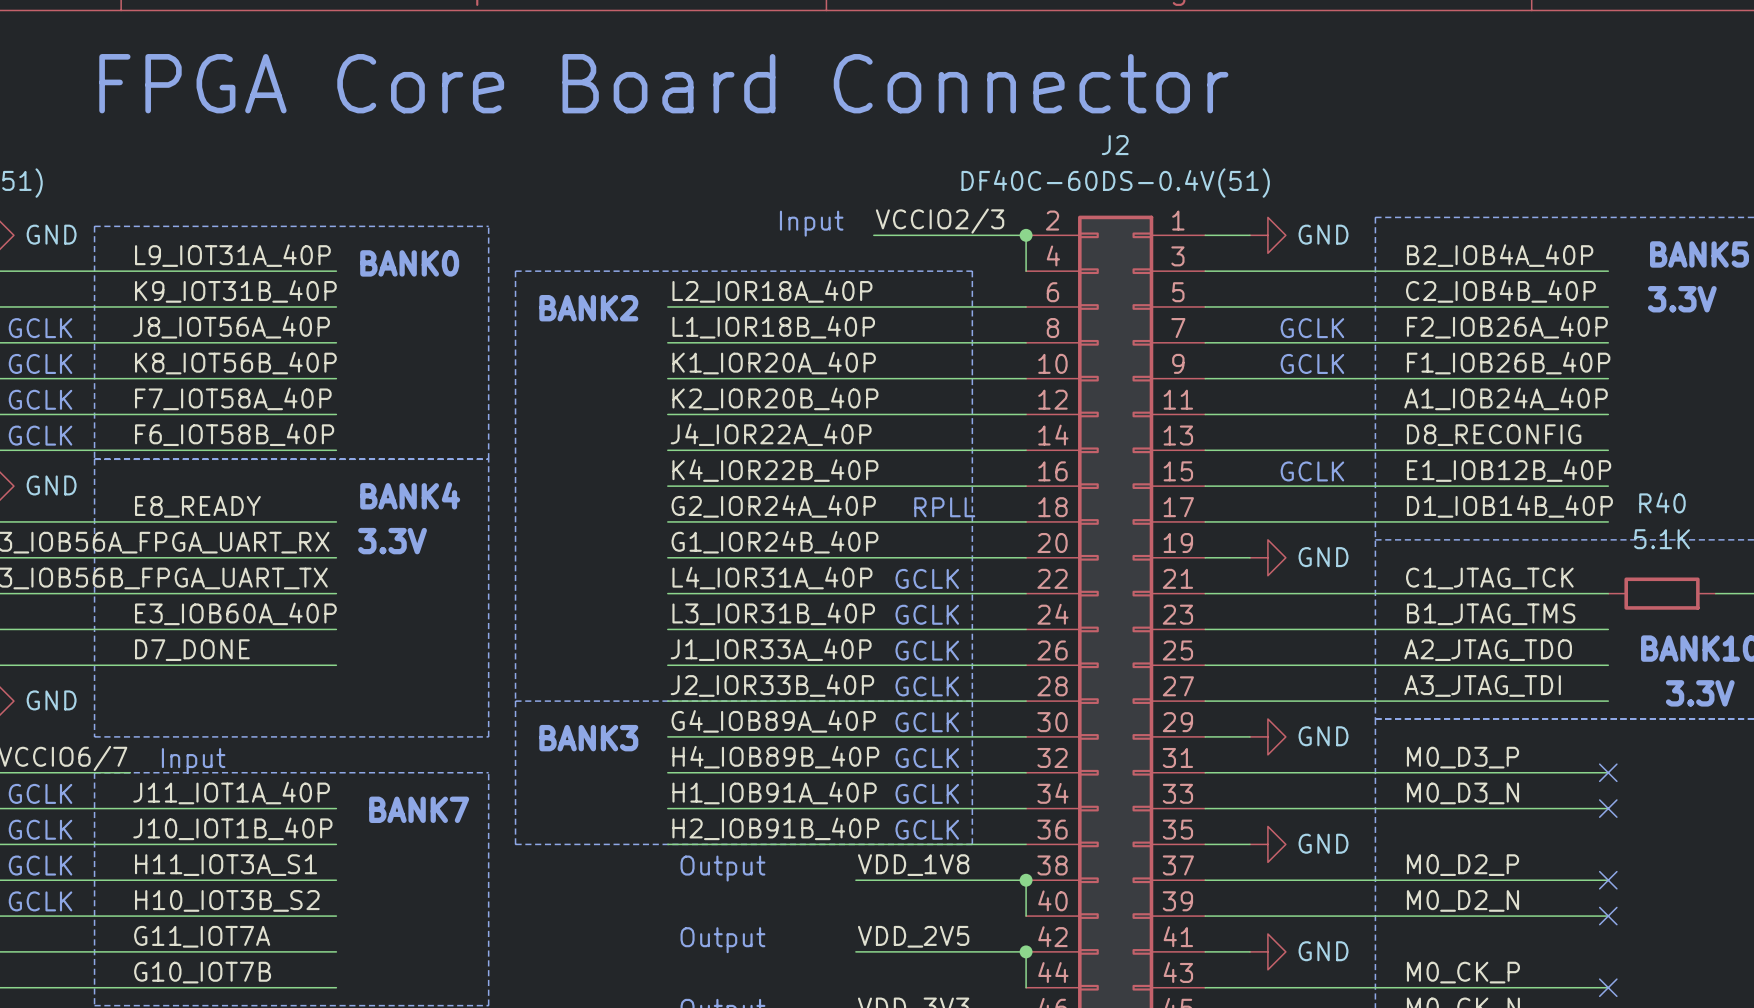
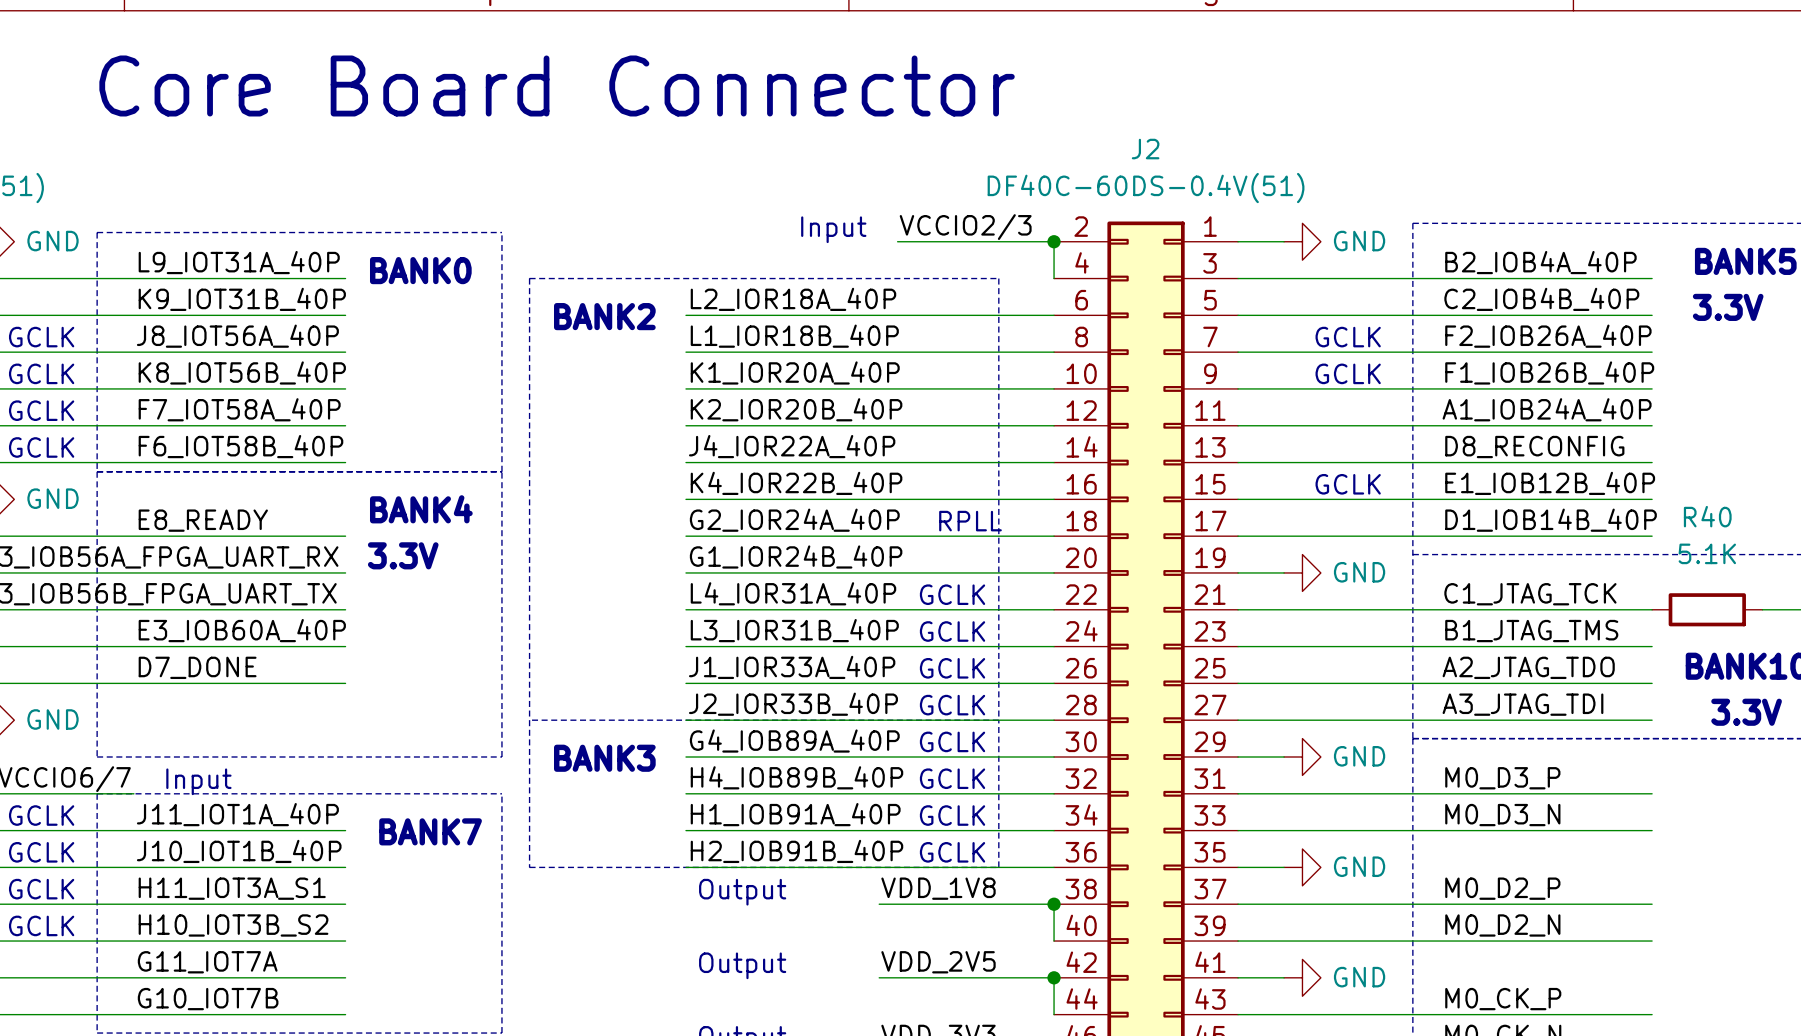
text: FPGA Core Board Connector (663, 83) -> Core Board Connector (557, 85)
no-connect mark: (1608, 772) -> none
no-connect mark: (1608, 808) -> none
no-connect mark: (1608, 880) -> none
no-connect mark: (1608, 916) -> none
no-connect mark: (1608, 987) -> none

